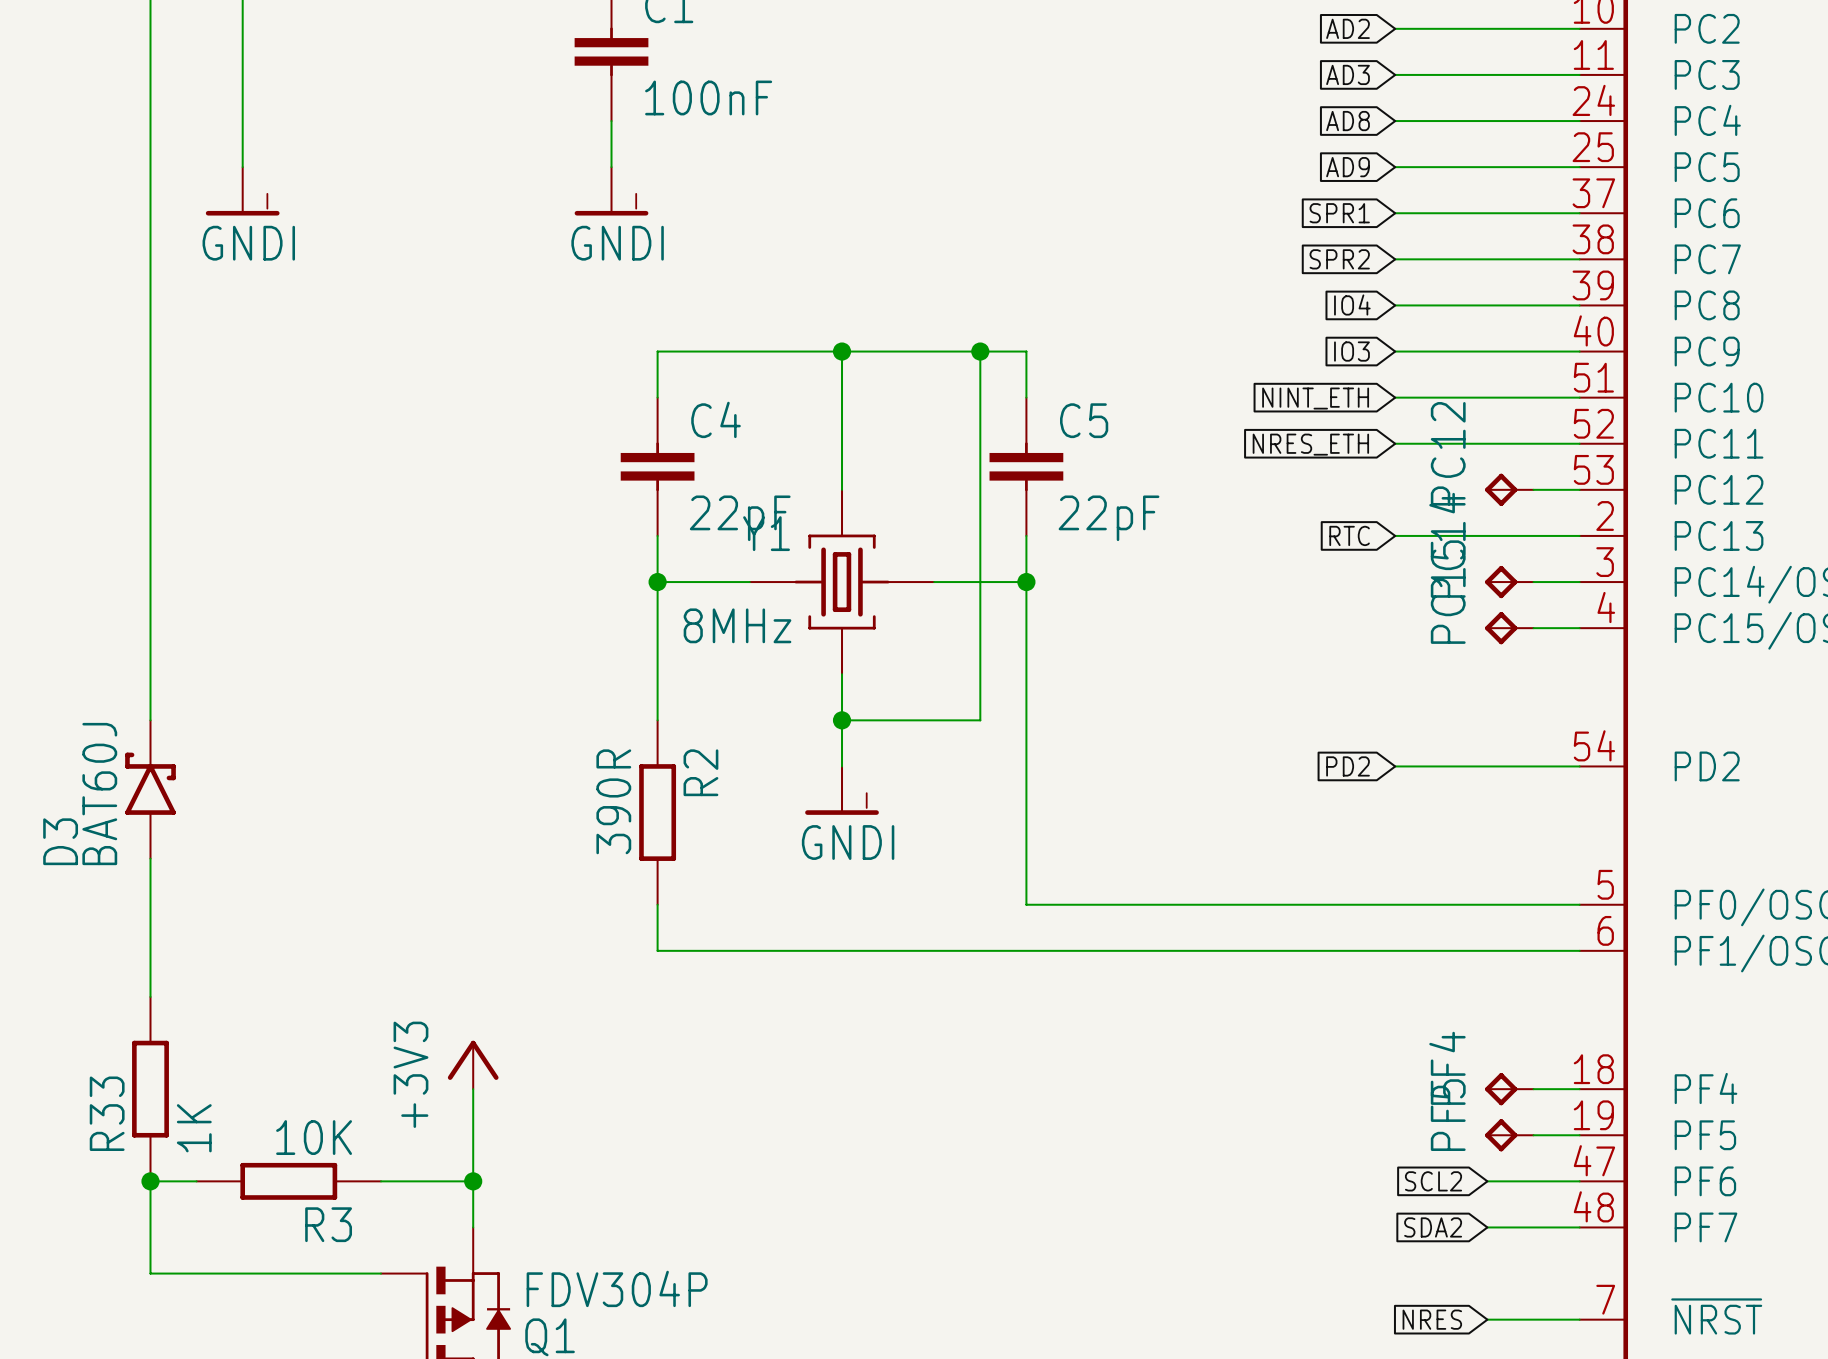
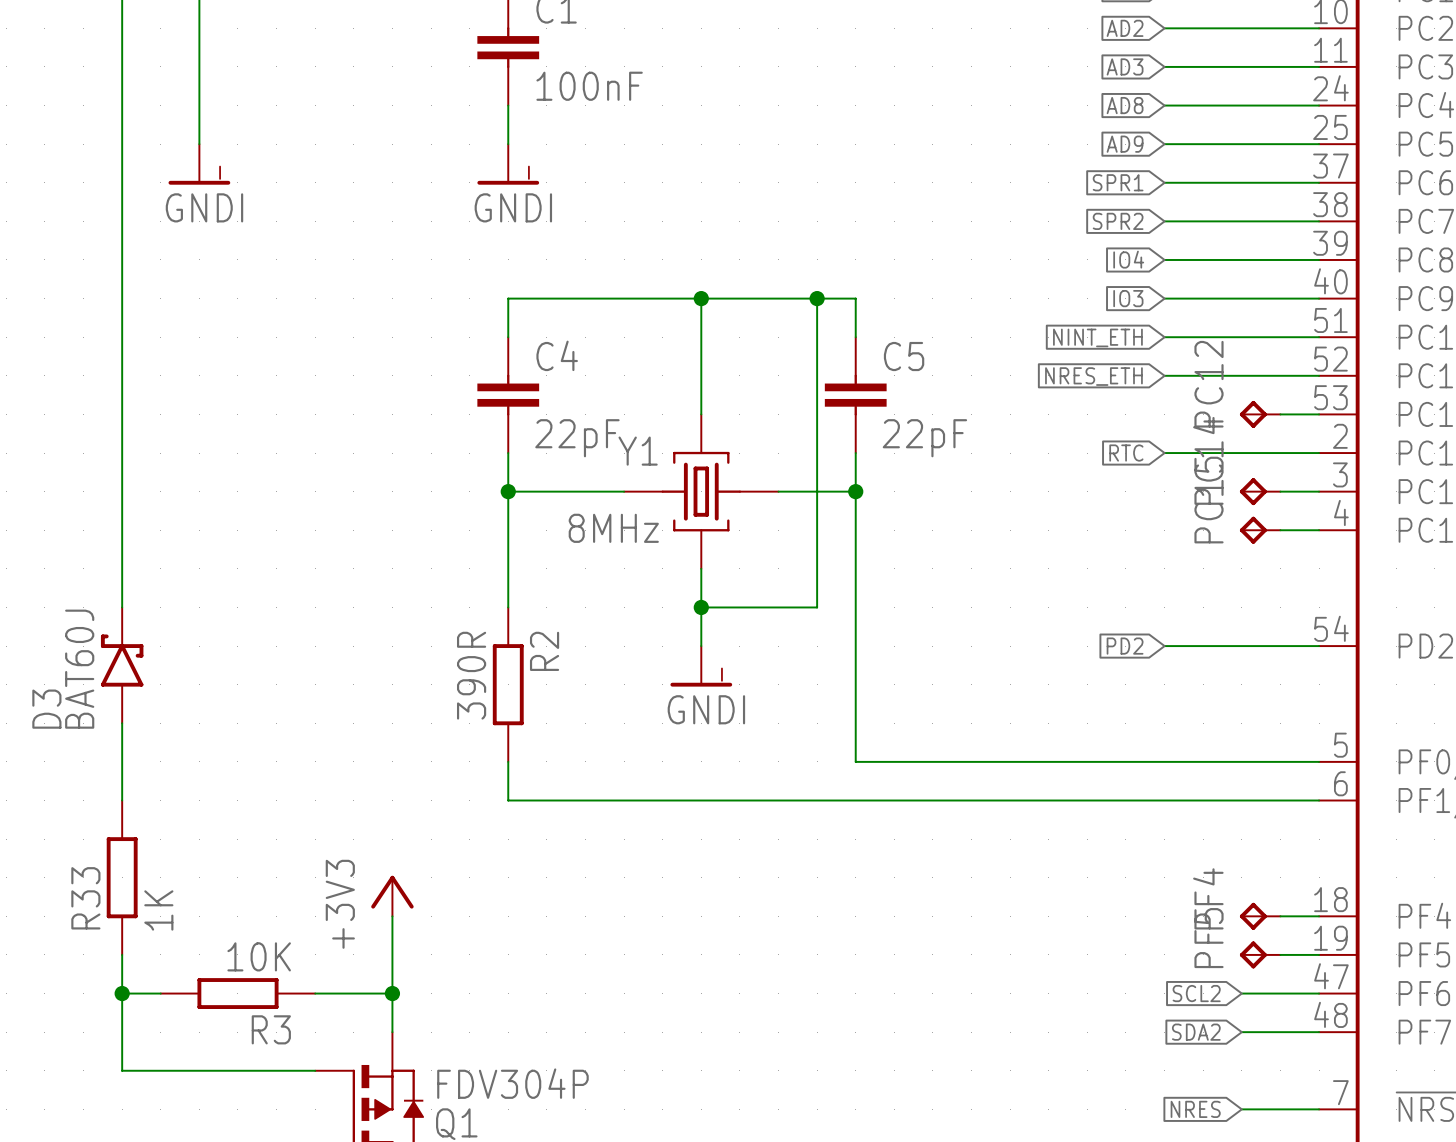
wire: (657, 351) (657, 397) -> (546, 298) (508, 298) (508, 337)
C4 position: (657, 466) -> (508, 395)
wire: (657, 535) (657, 720) -> (508, 453) (508, 607)
wire: none -> (508, 491) (546, 491)
junction position: (657, 582) -> (508, 491)
R2 position: (657, 812) -> (508, 684)
wire: (657, 904) (657, 950) -> (508, 761) (508, 800) (546, 800)
R33 position: (150, 1089) -> (122, 877)

